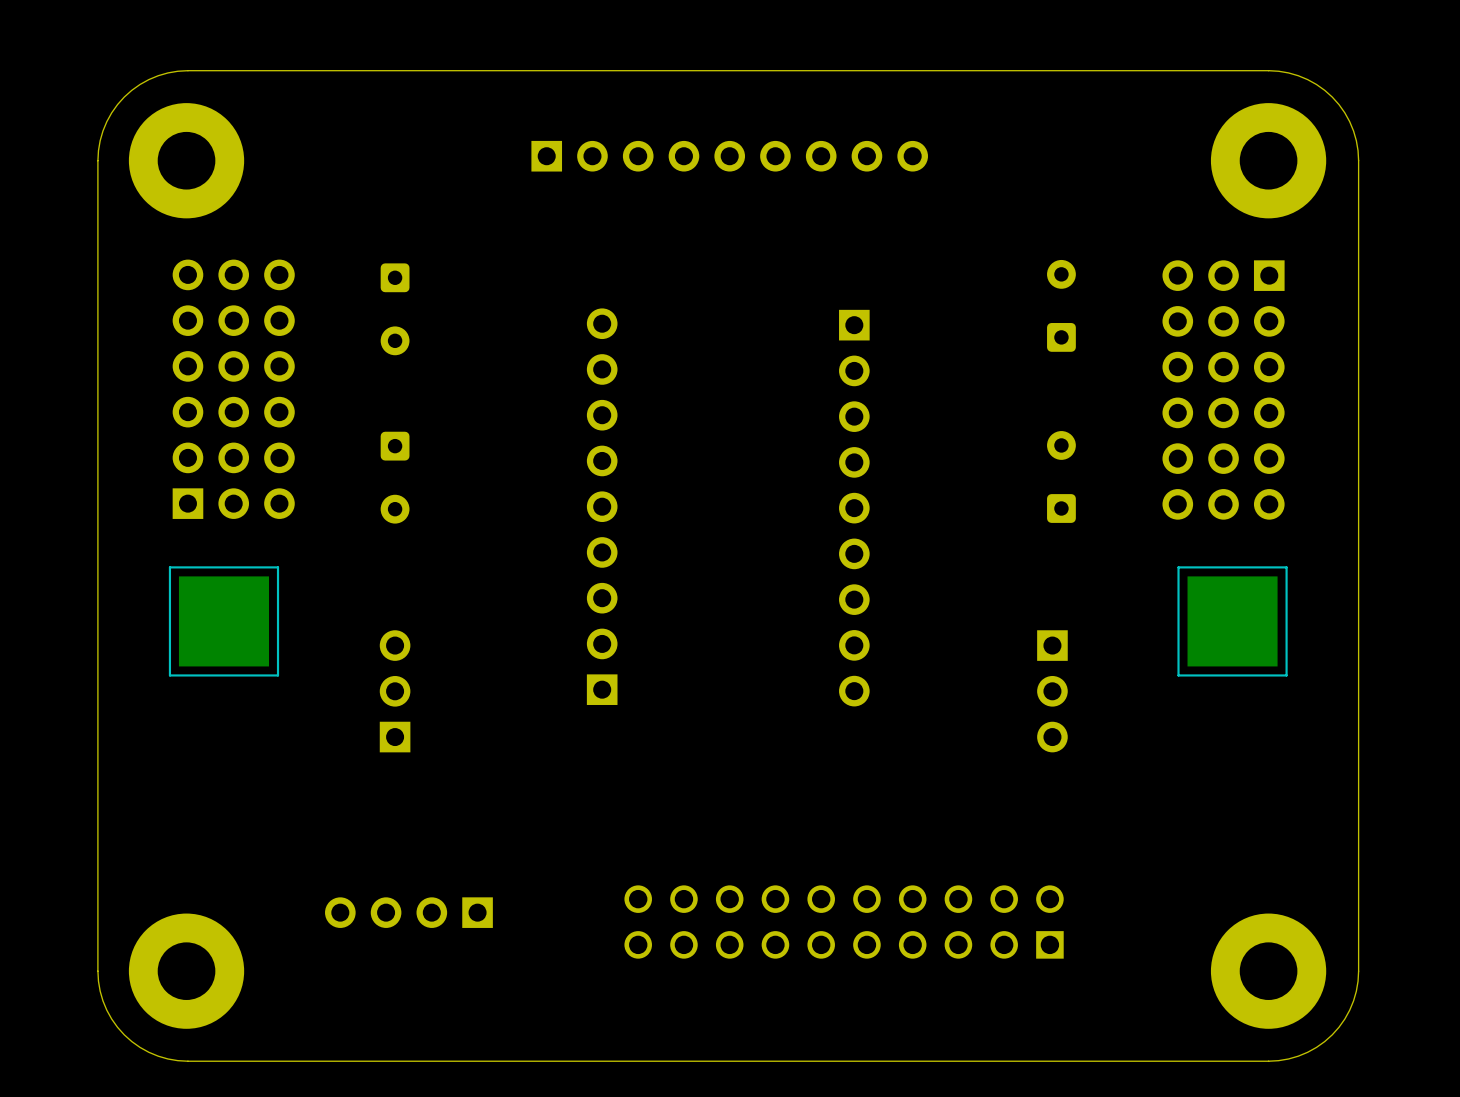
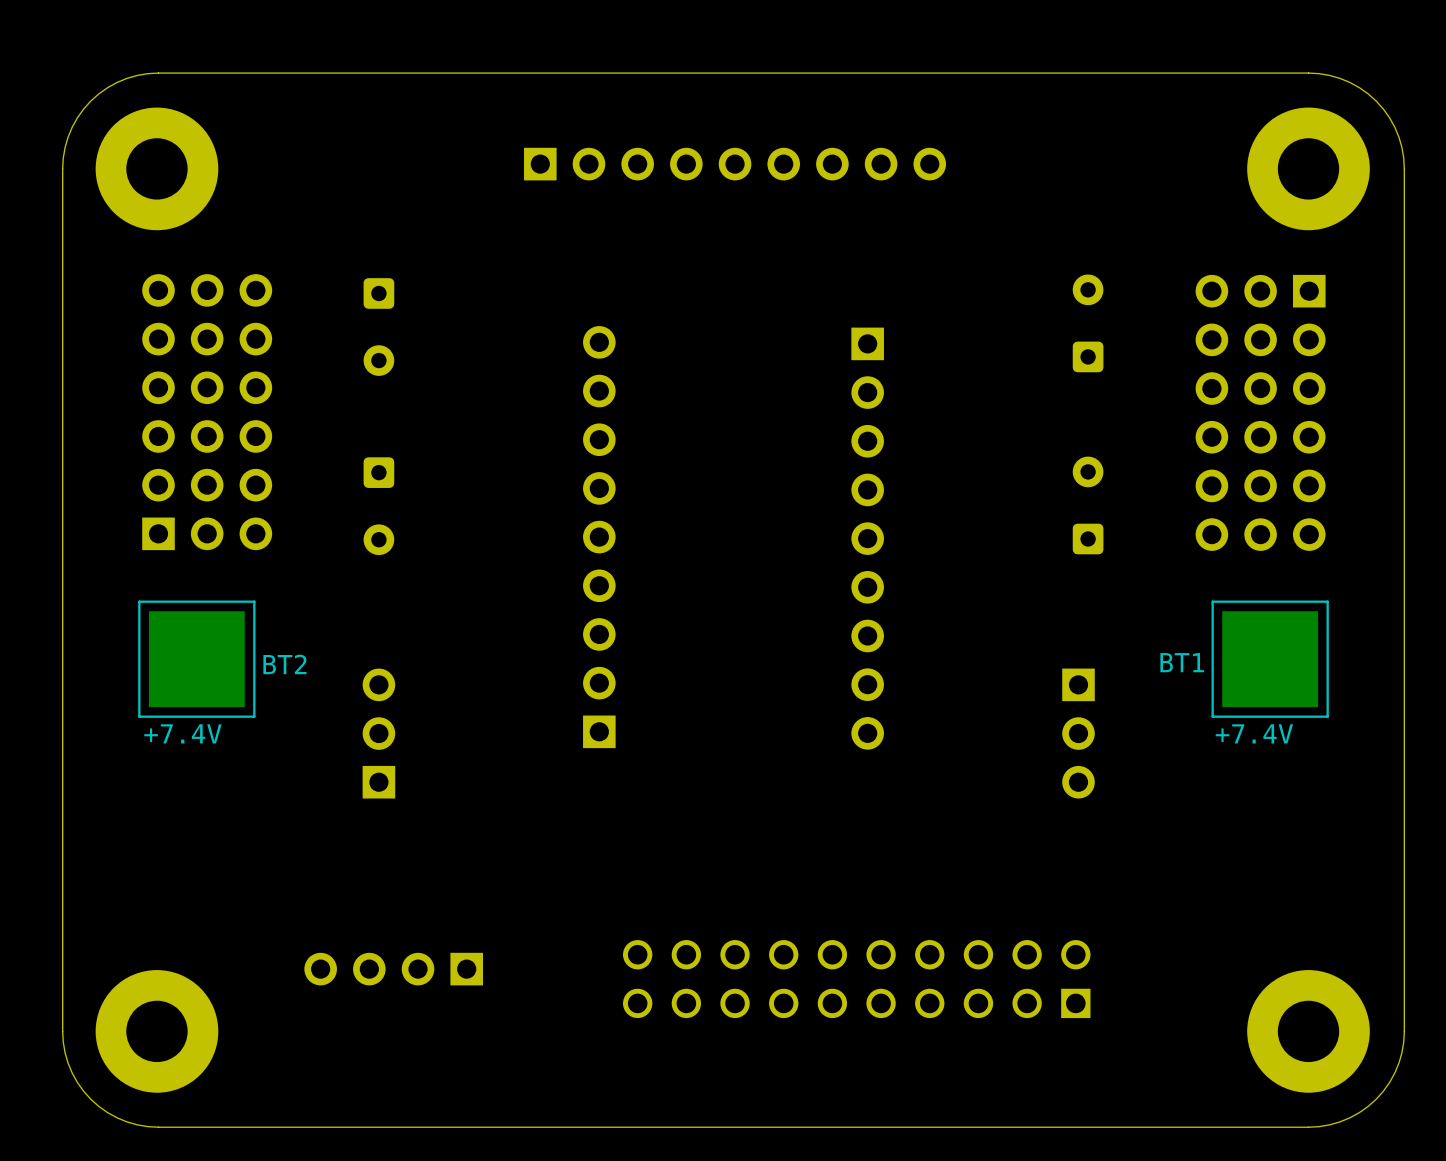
text: none -> BT1 (1182, 662)
text: none -> BT2 (284, 664)
text: none -> +7.4V (182, 733)
text: none -> +7.4V (1254, 733)

